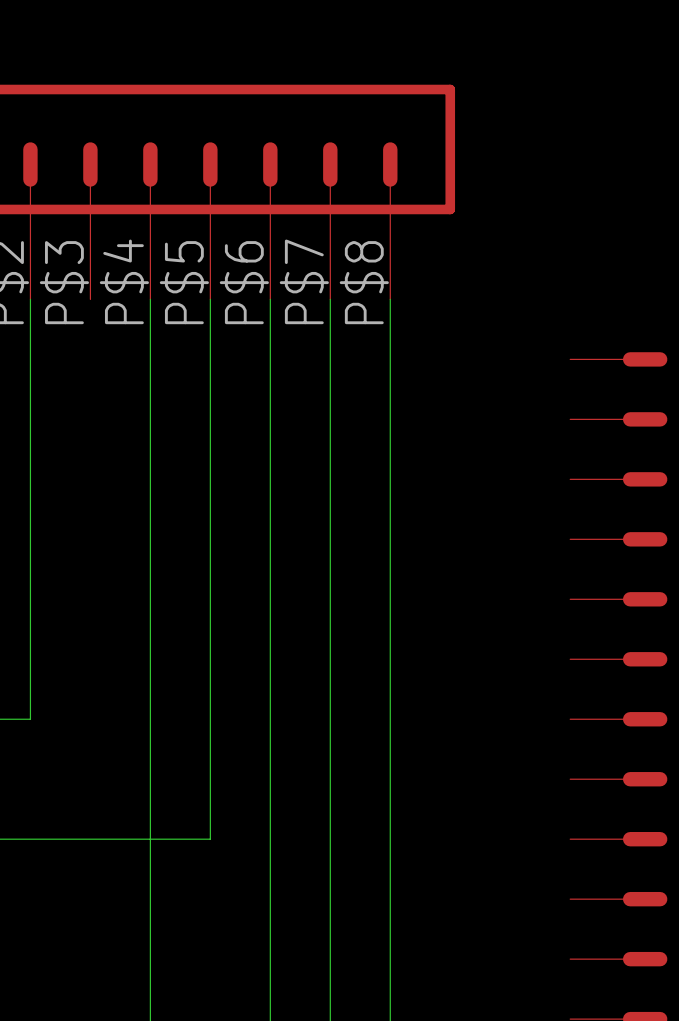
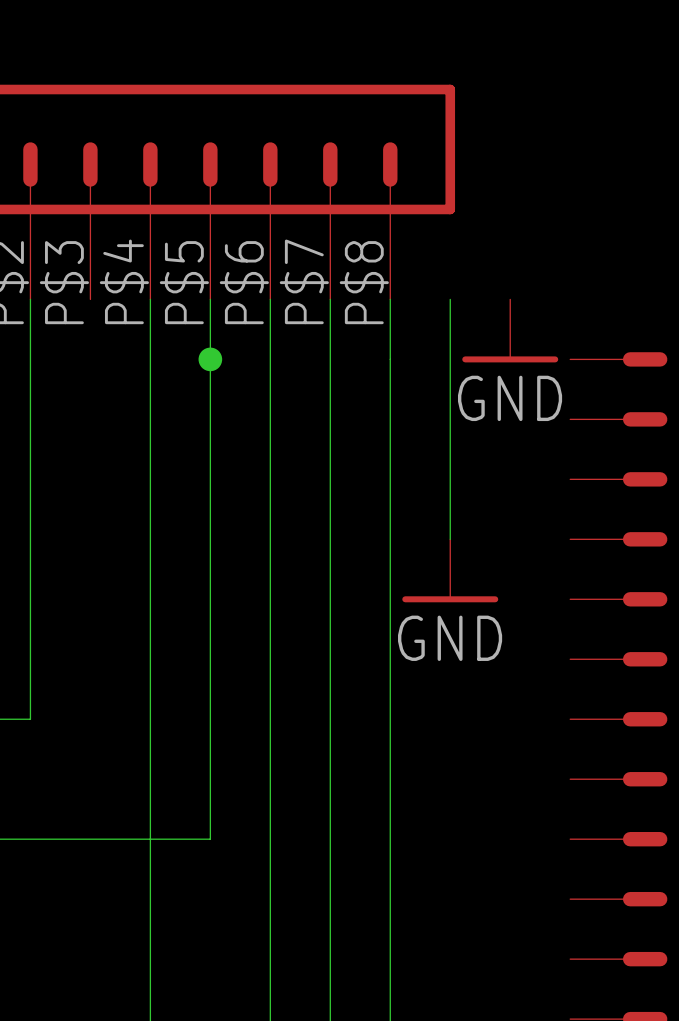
wire: none -> (450, 299) (450, 539)
power symbol: none -> GND (510, 330)
junction: none -> (210, 359)
power symbol: none -> GND (450, 570)

